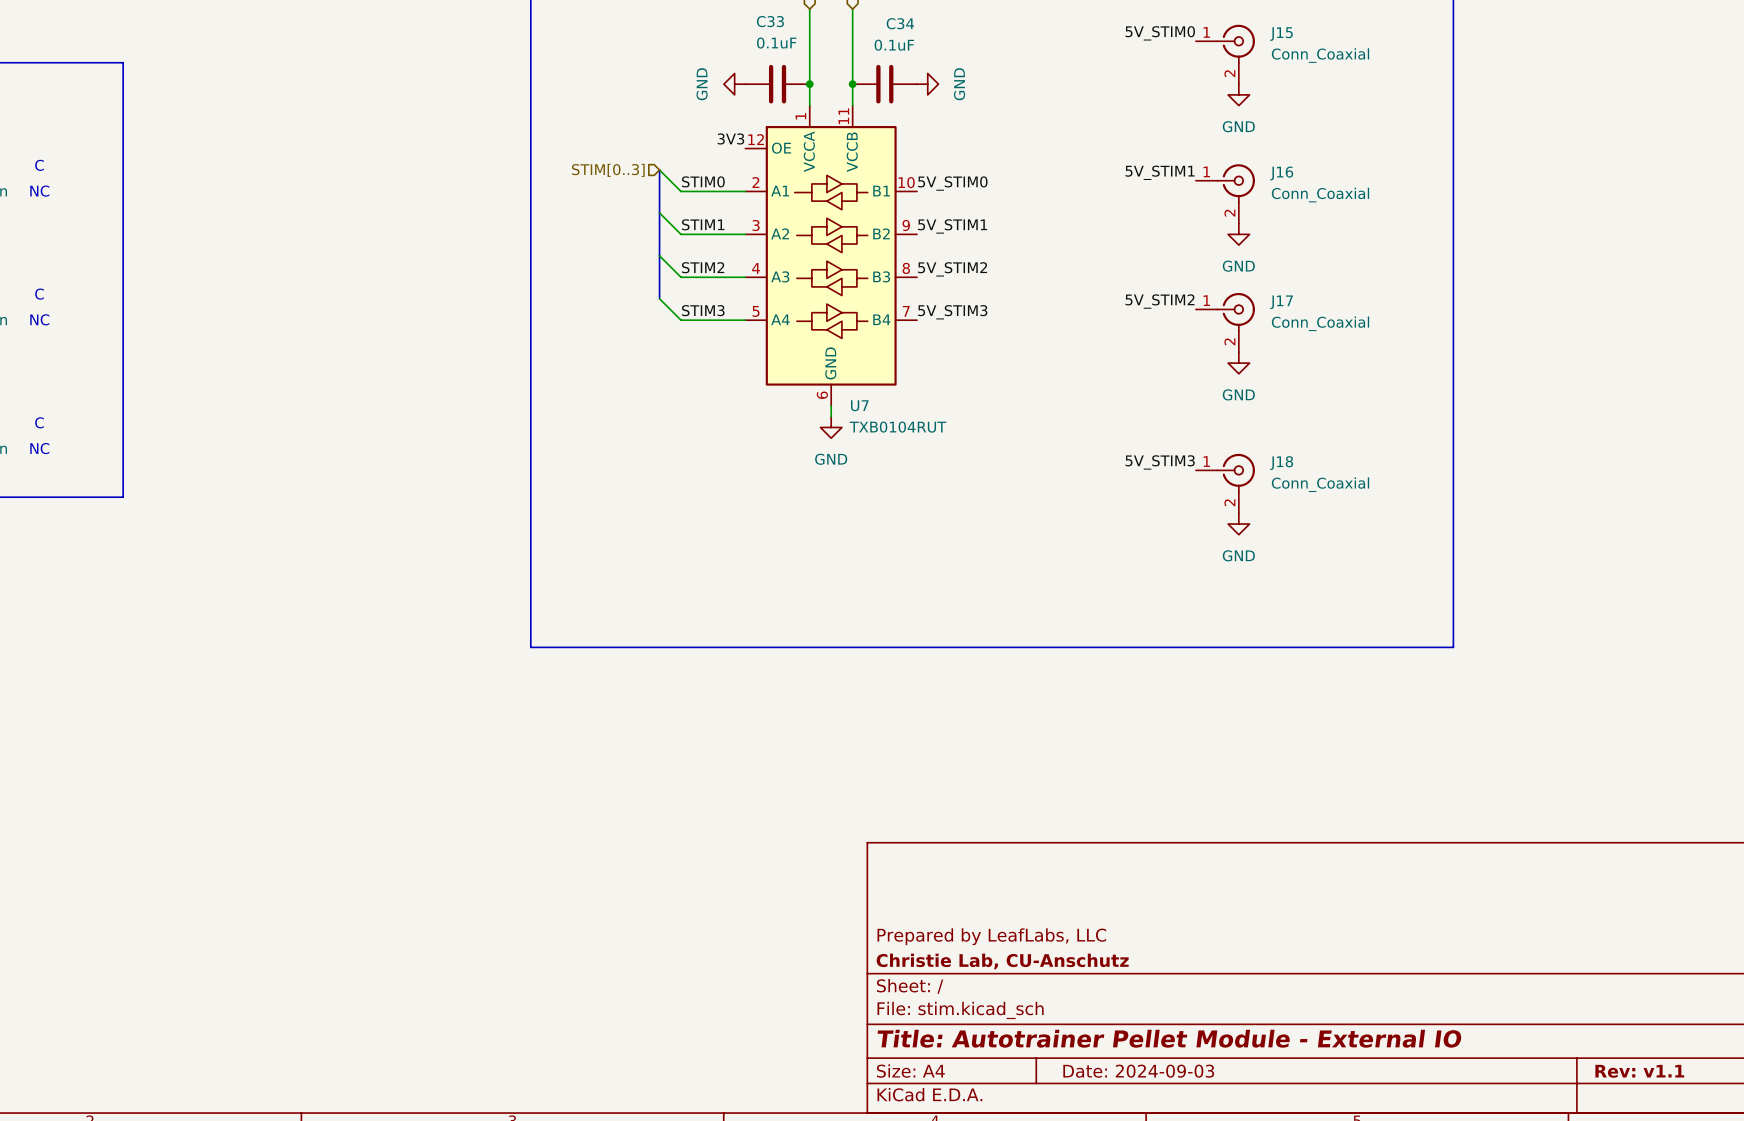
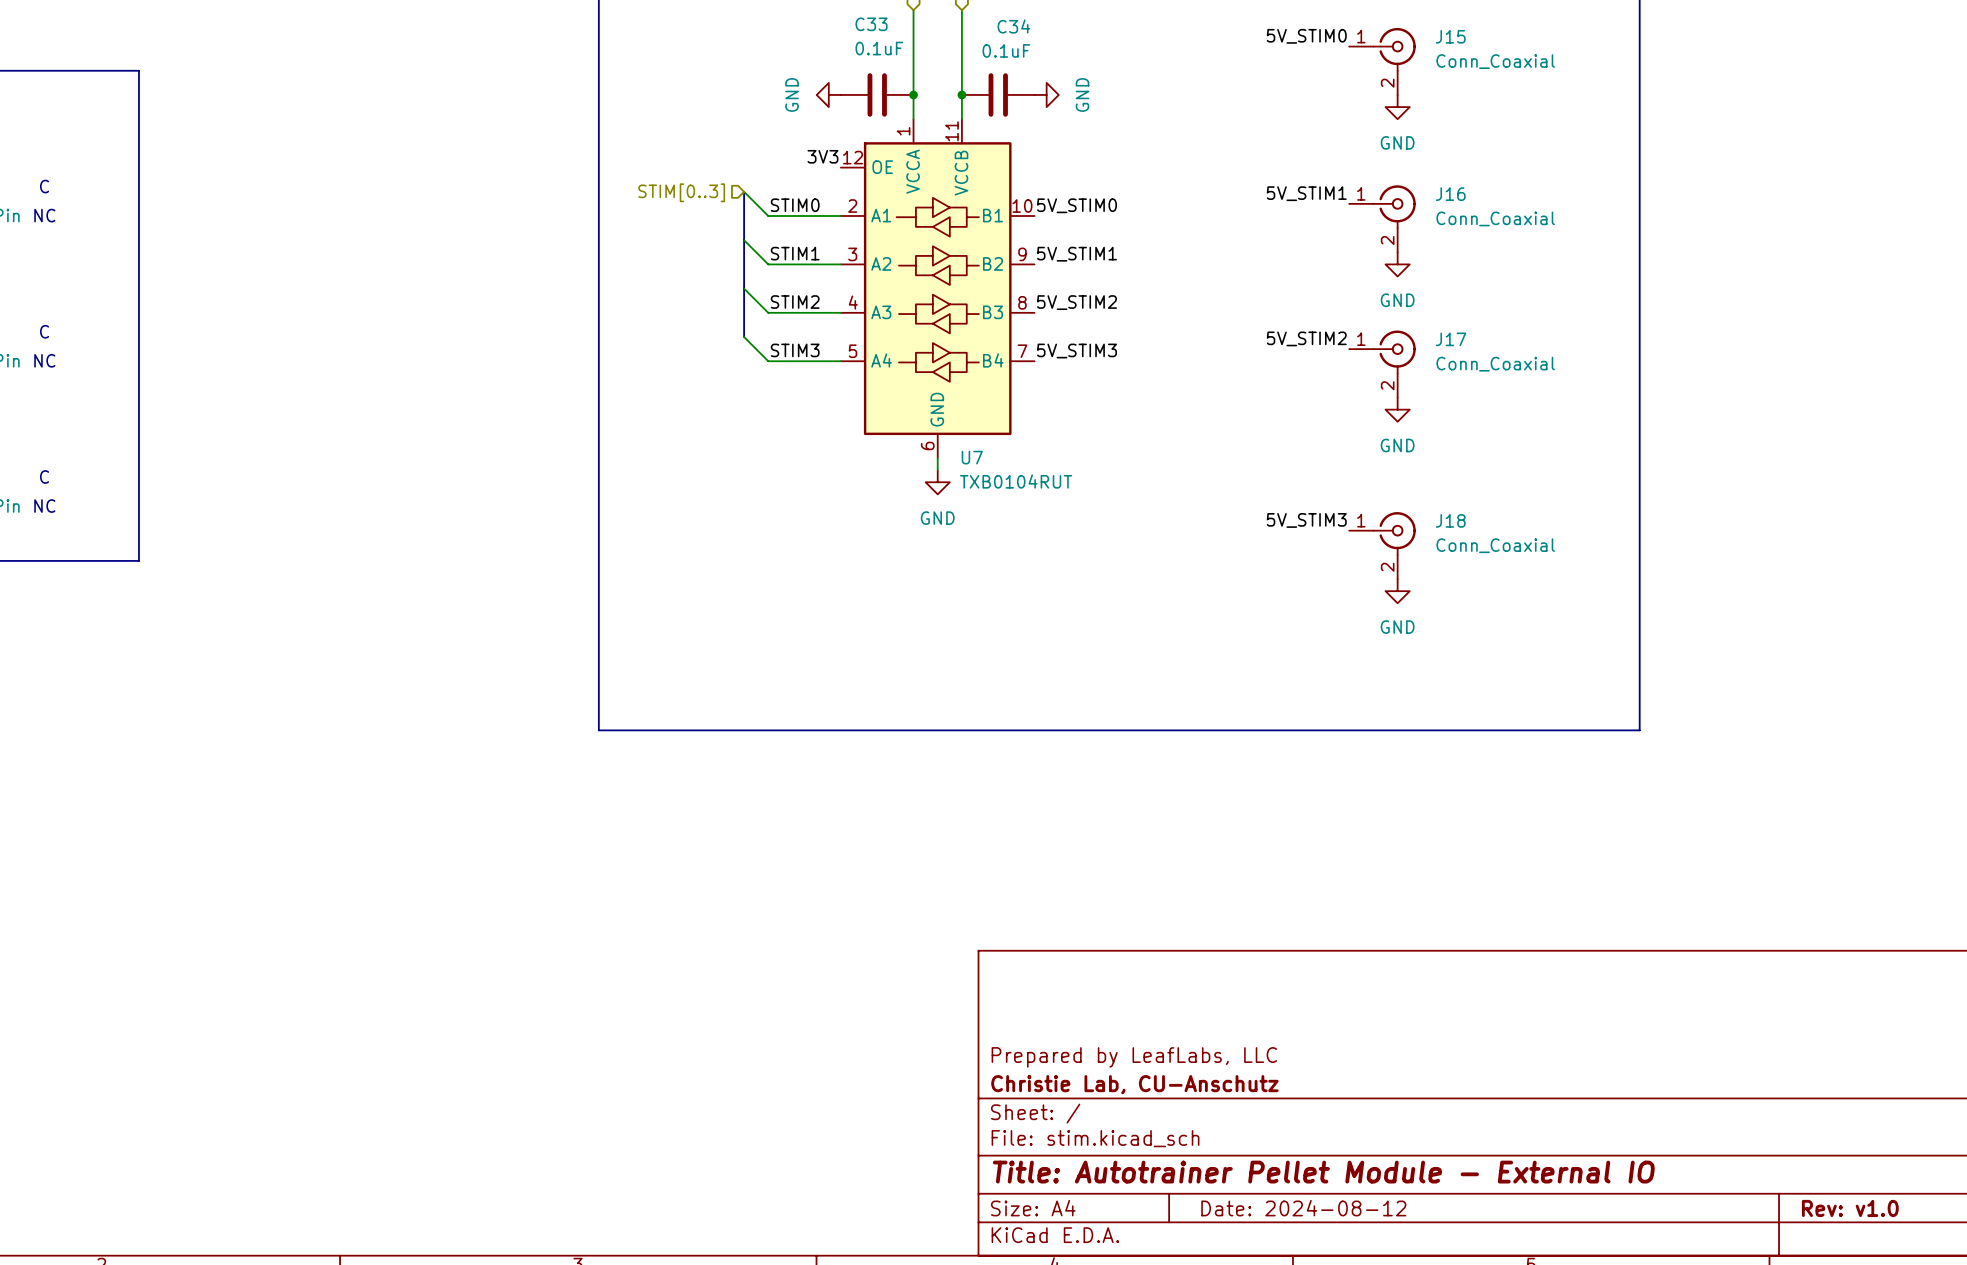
title block: Date: 2024-09-03 (1138, 1071) -> Date: 2024-08-12 (1303, 1208)
title block: Rev: v1.1 (1639, 1071) -> Rev: v1.0 (1850, 1208)

